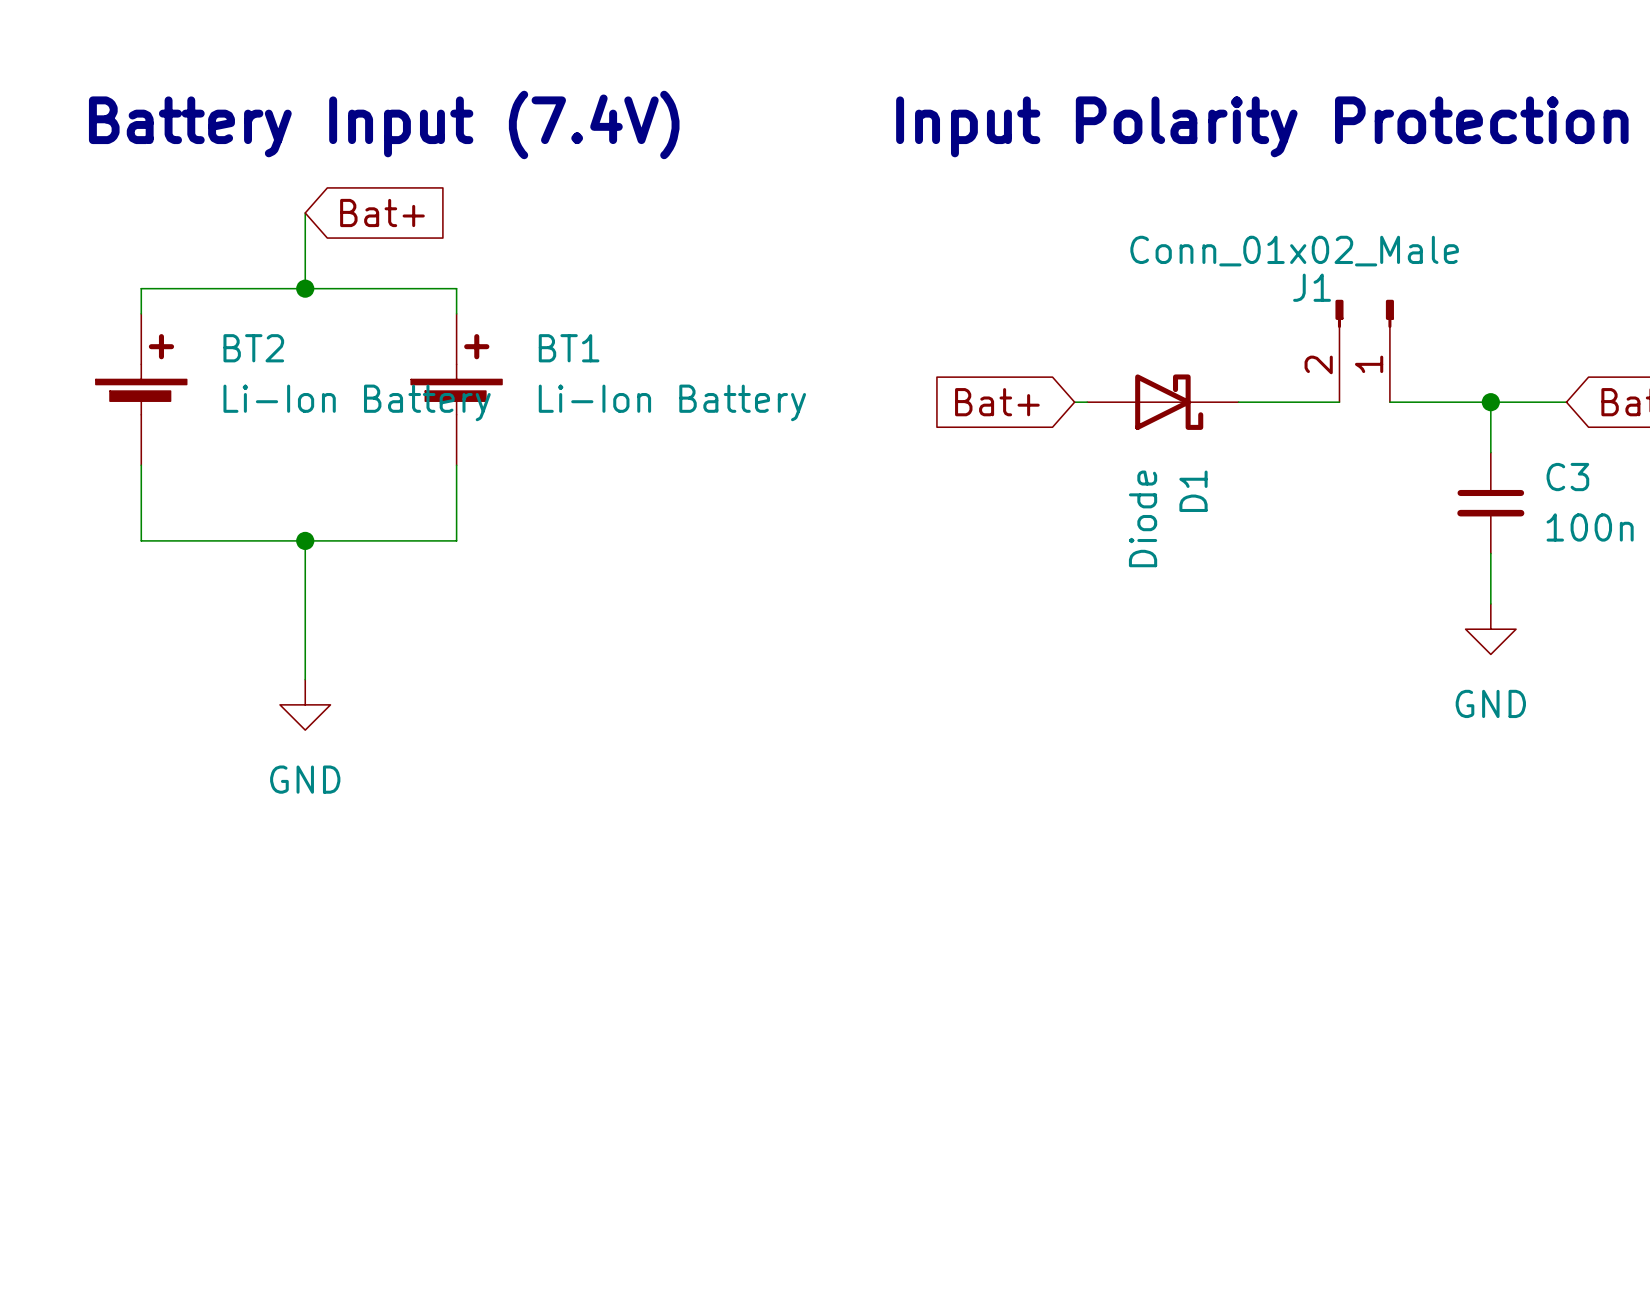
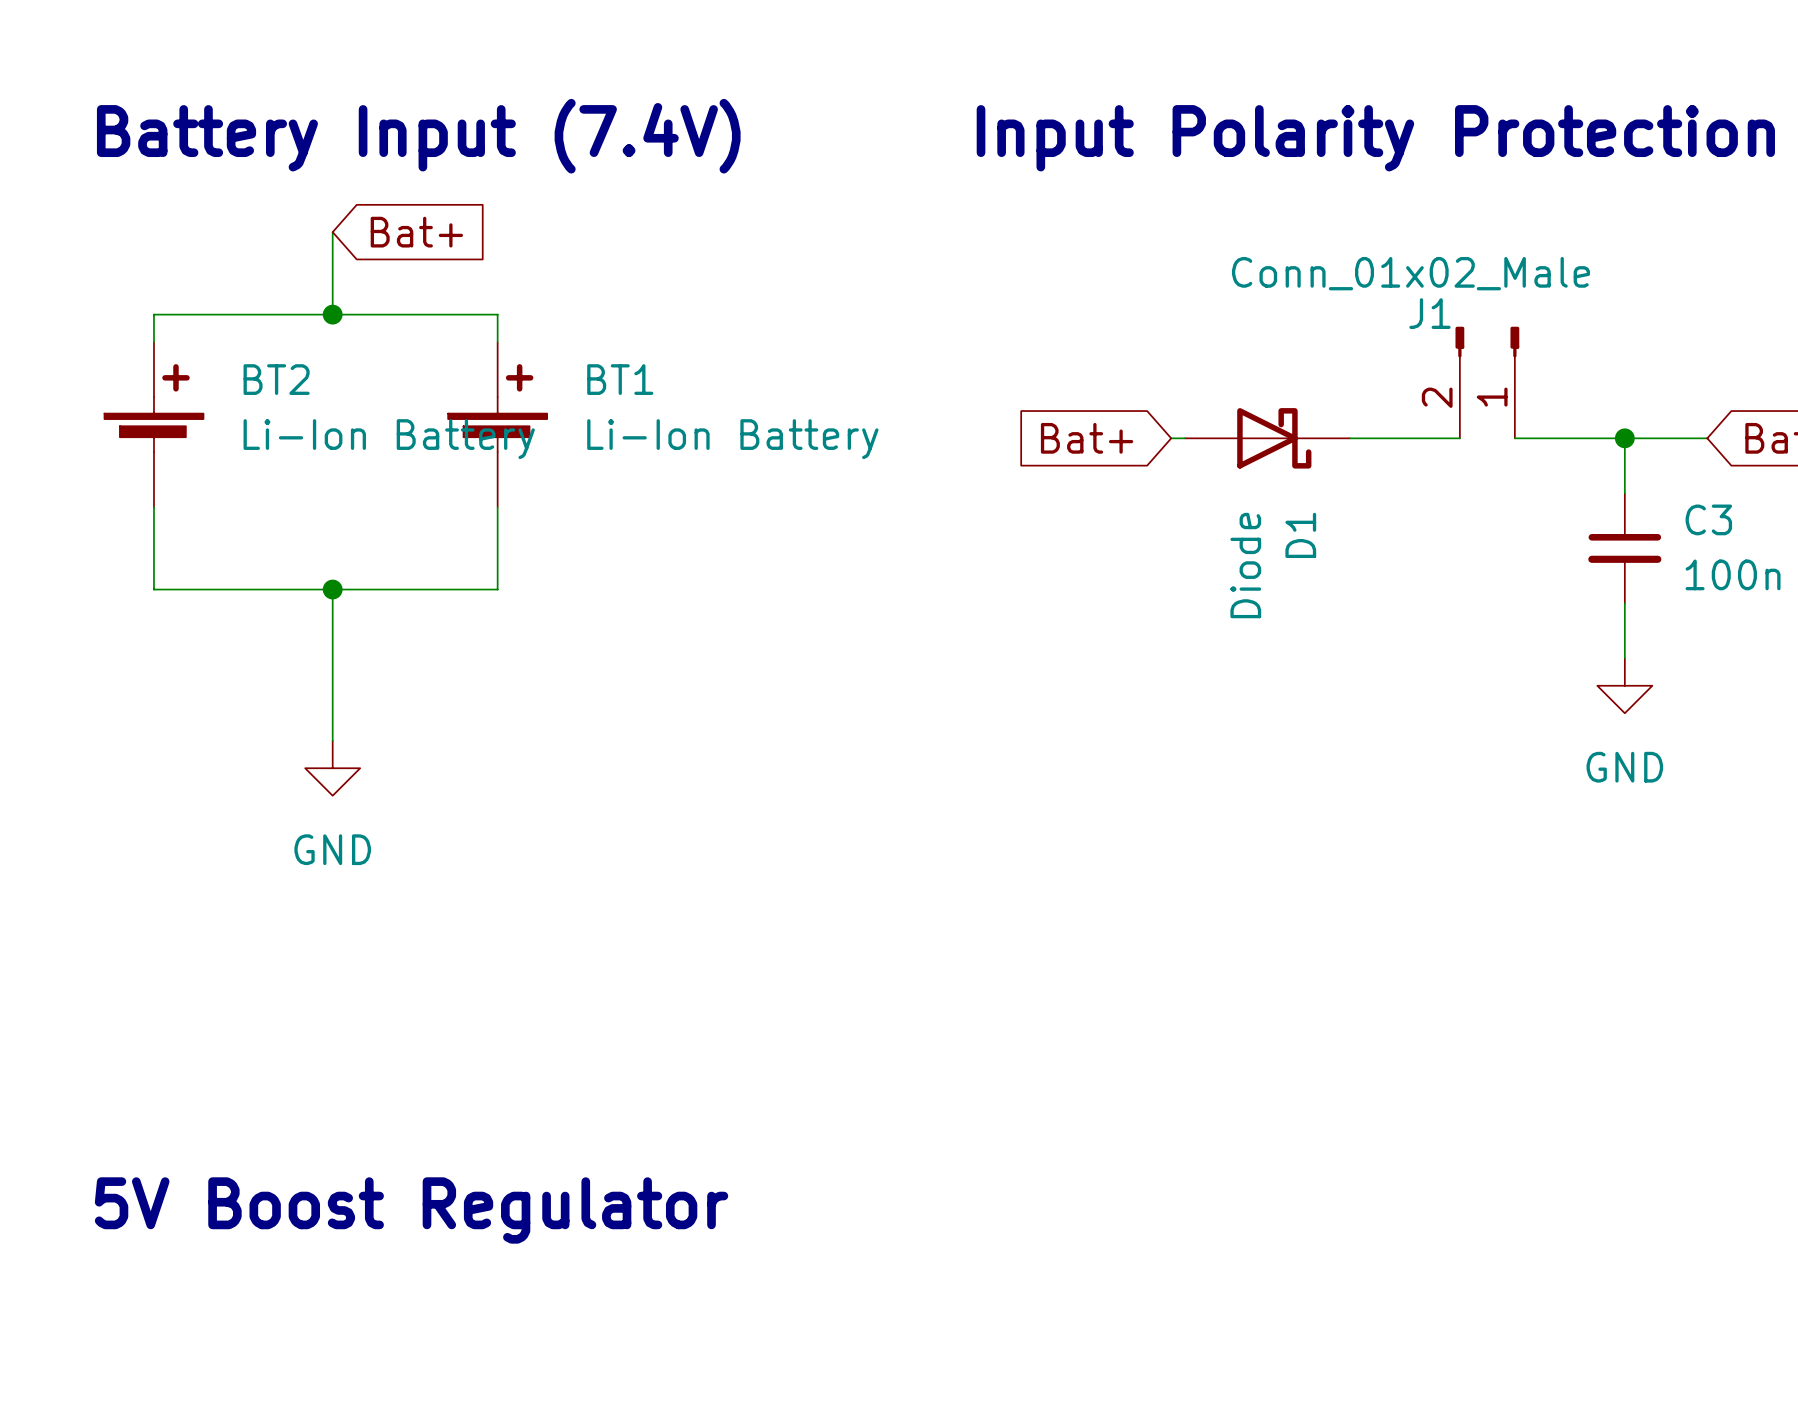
text: none -> 5V Boost Regulator (411, 1210)

